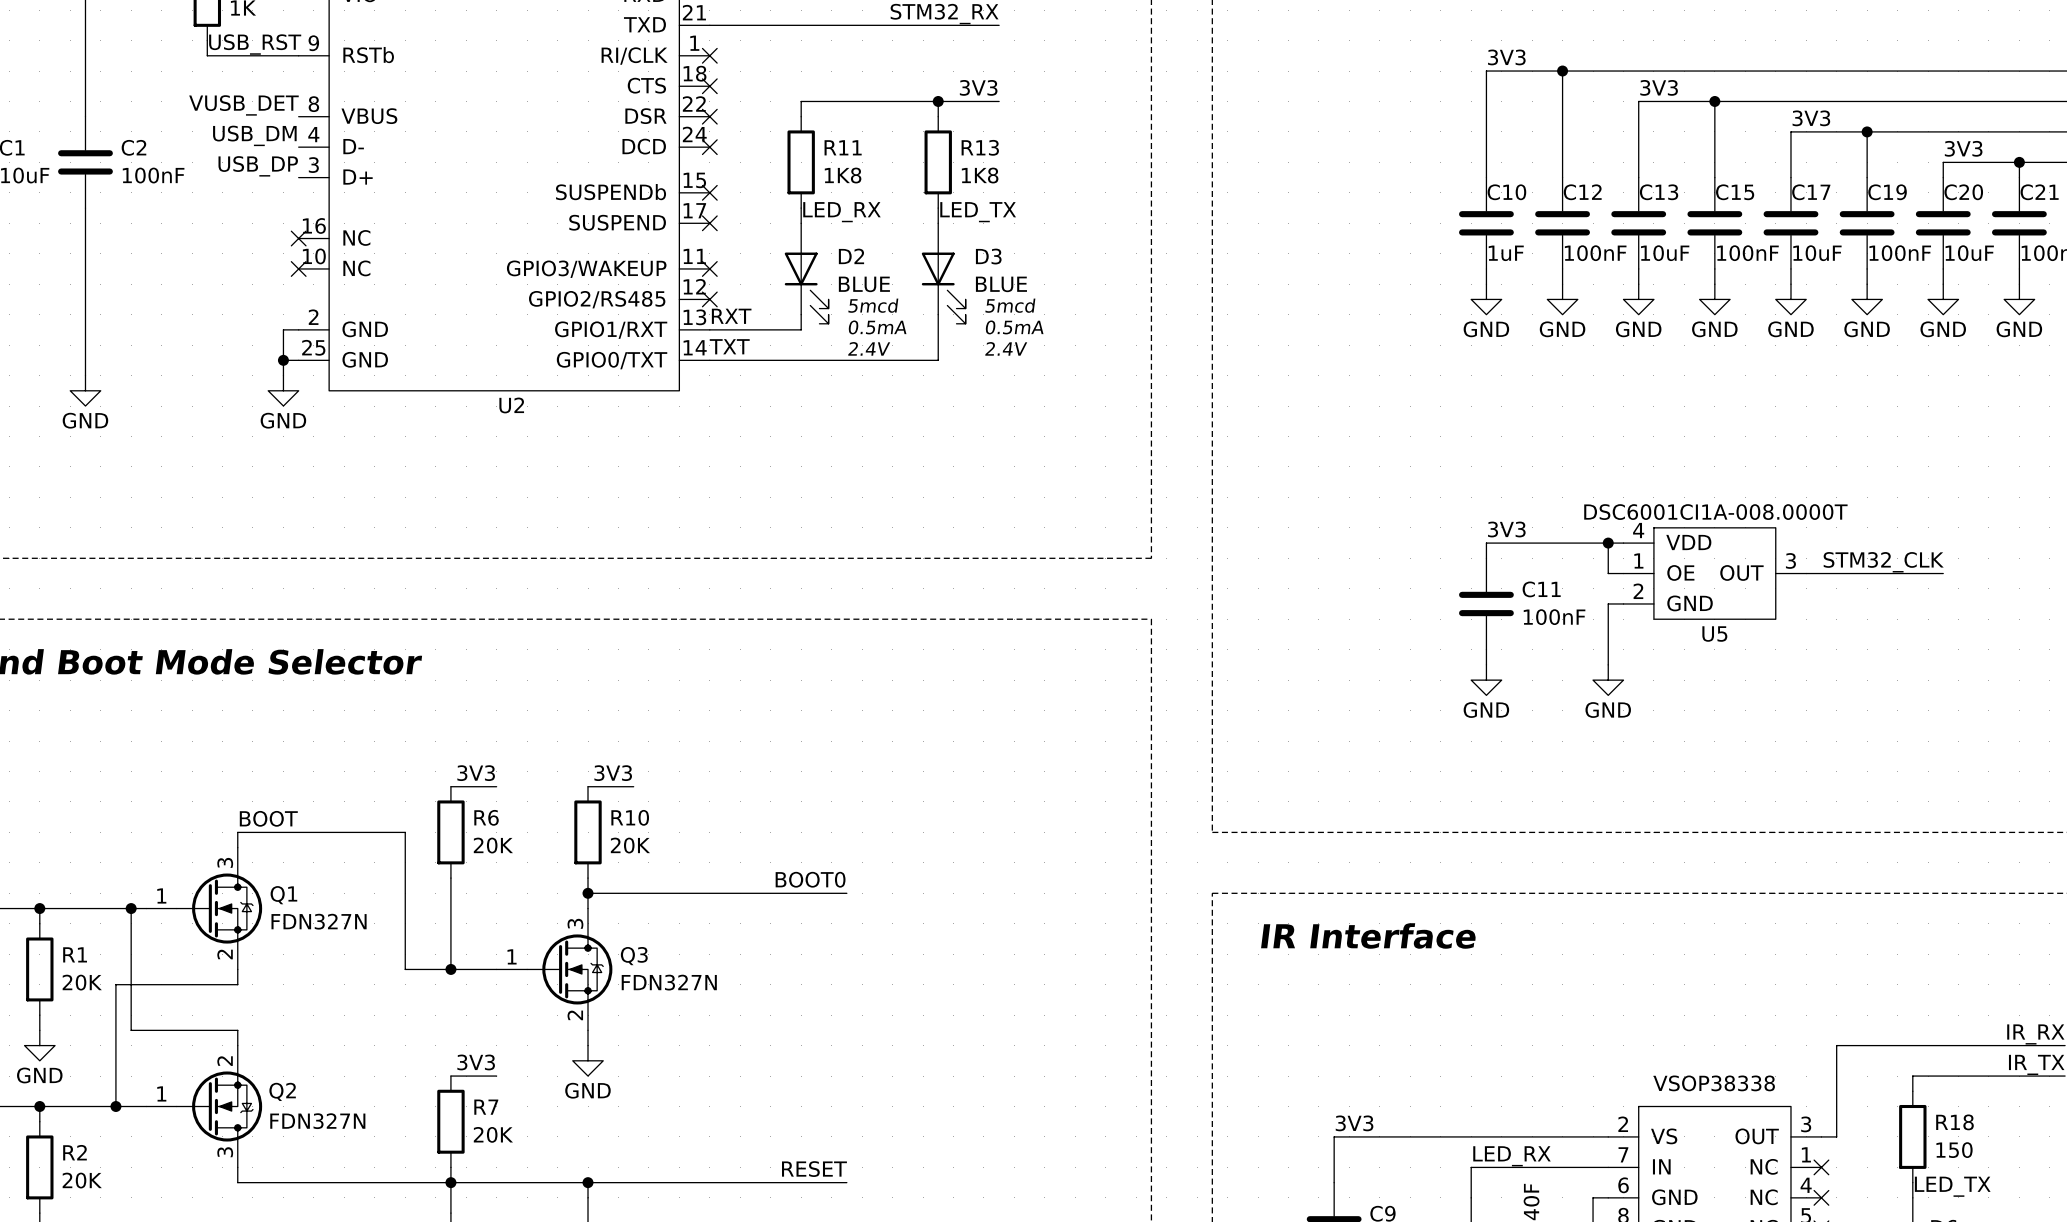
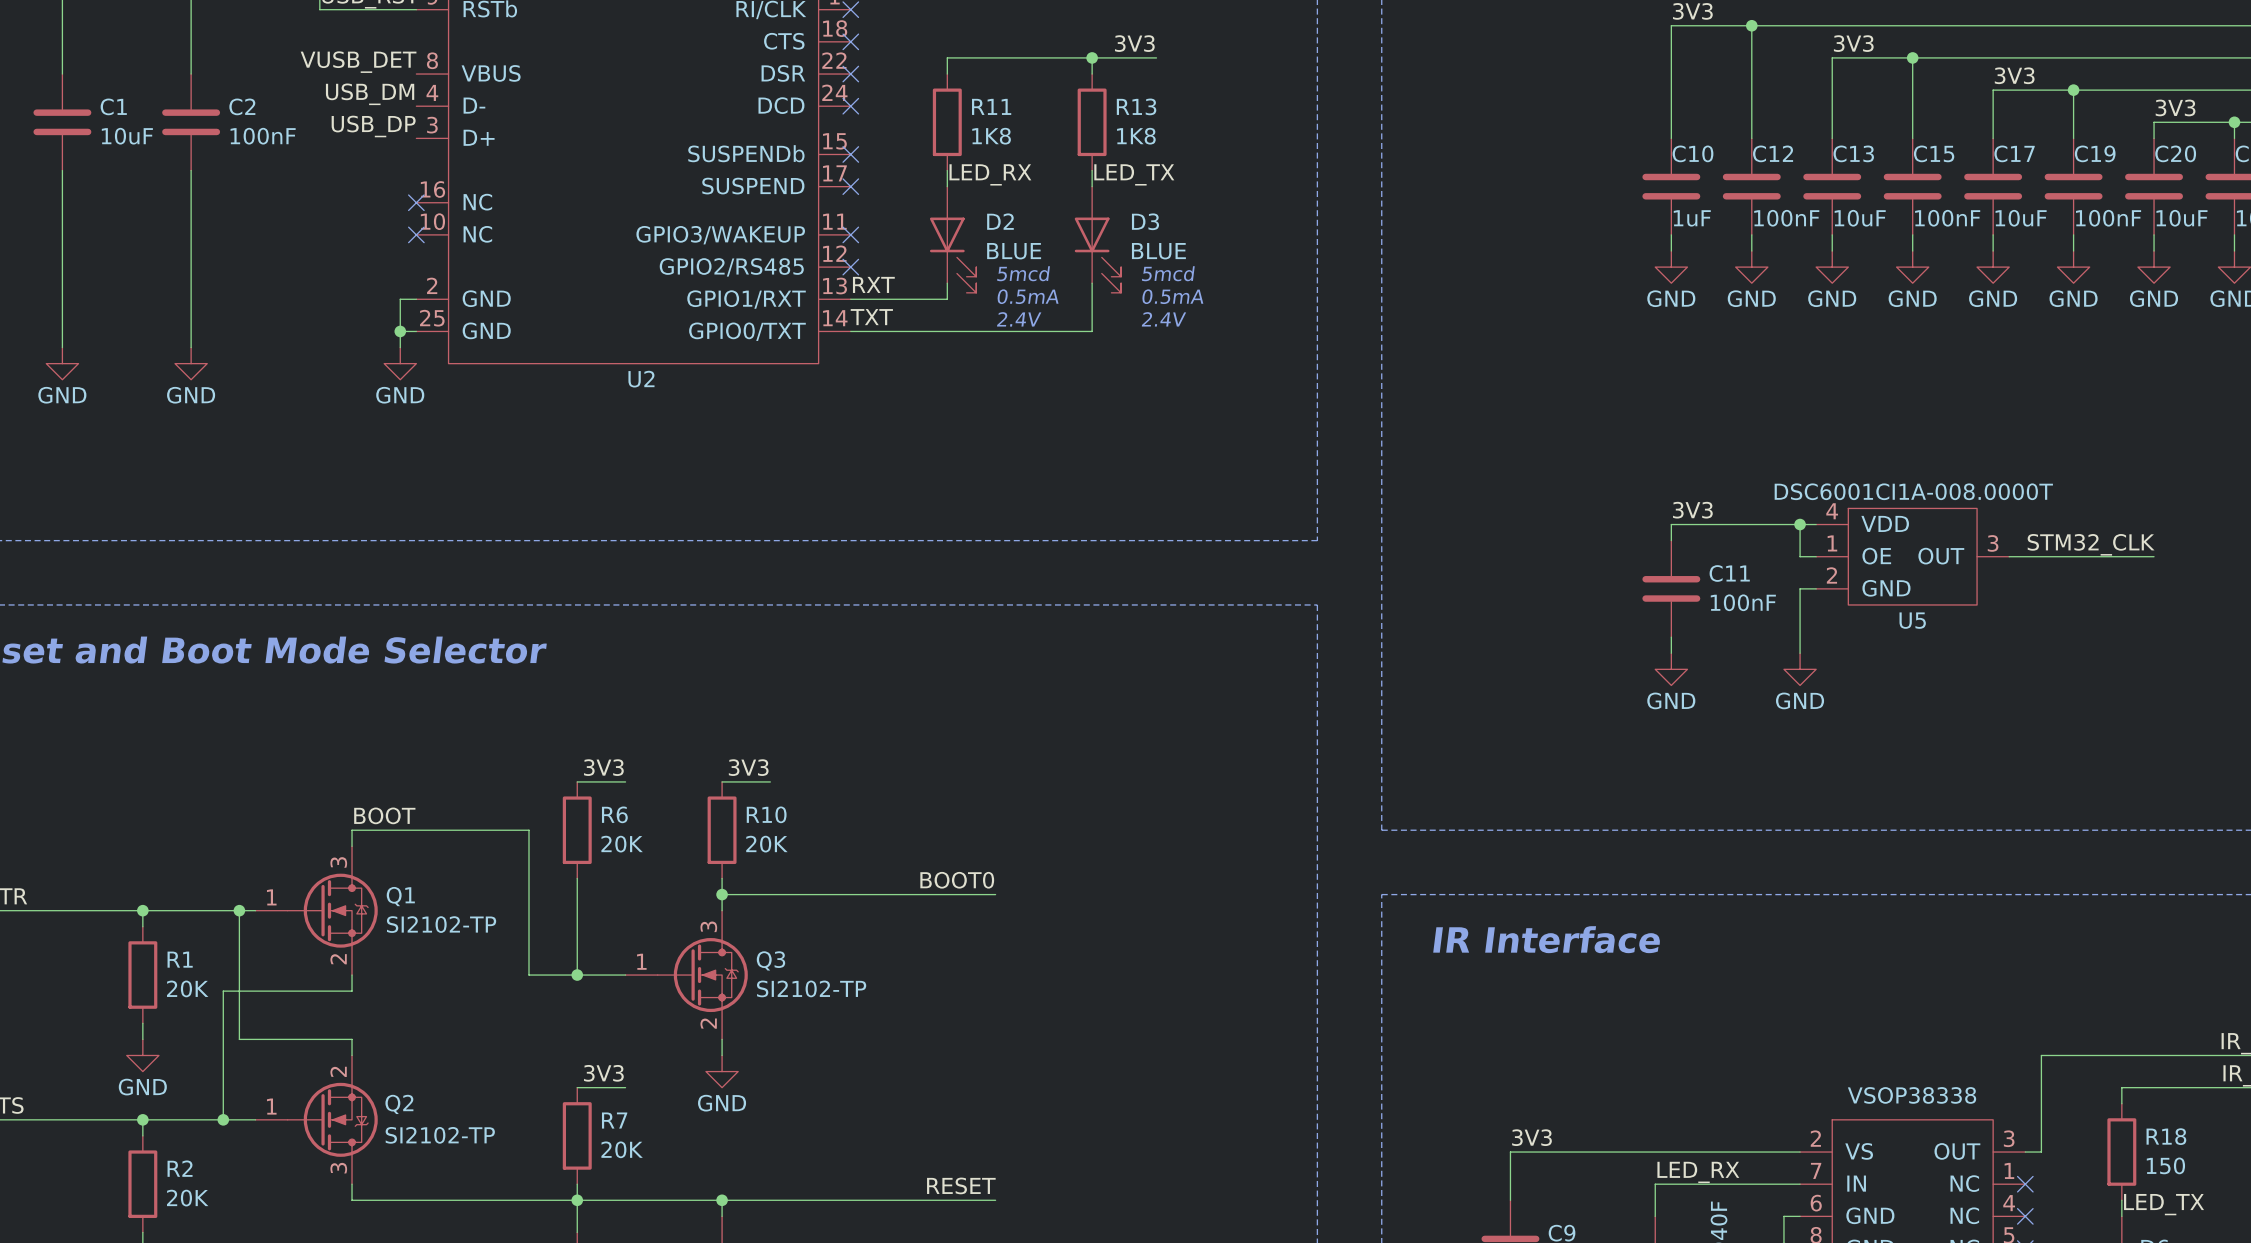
Q1 value: FDN327N (319, 921) -> SI2102-TP (441, 924)
Q3 value: FDN327N (669, 982) -> SI2102-TP (811, 988)
Q2 value: FDN327N (317, 1121) -> SI2102-TP (440, 1135)

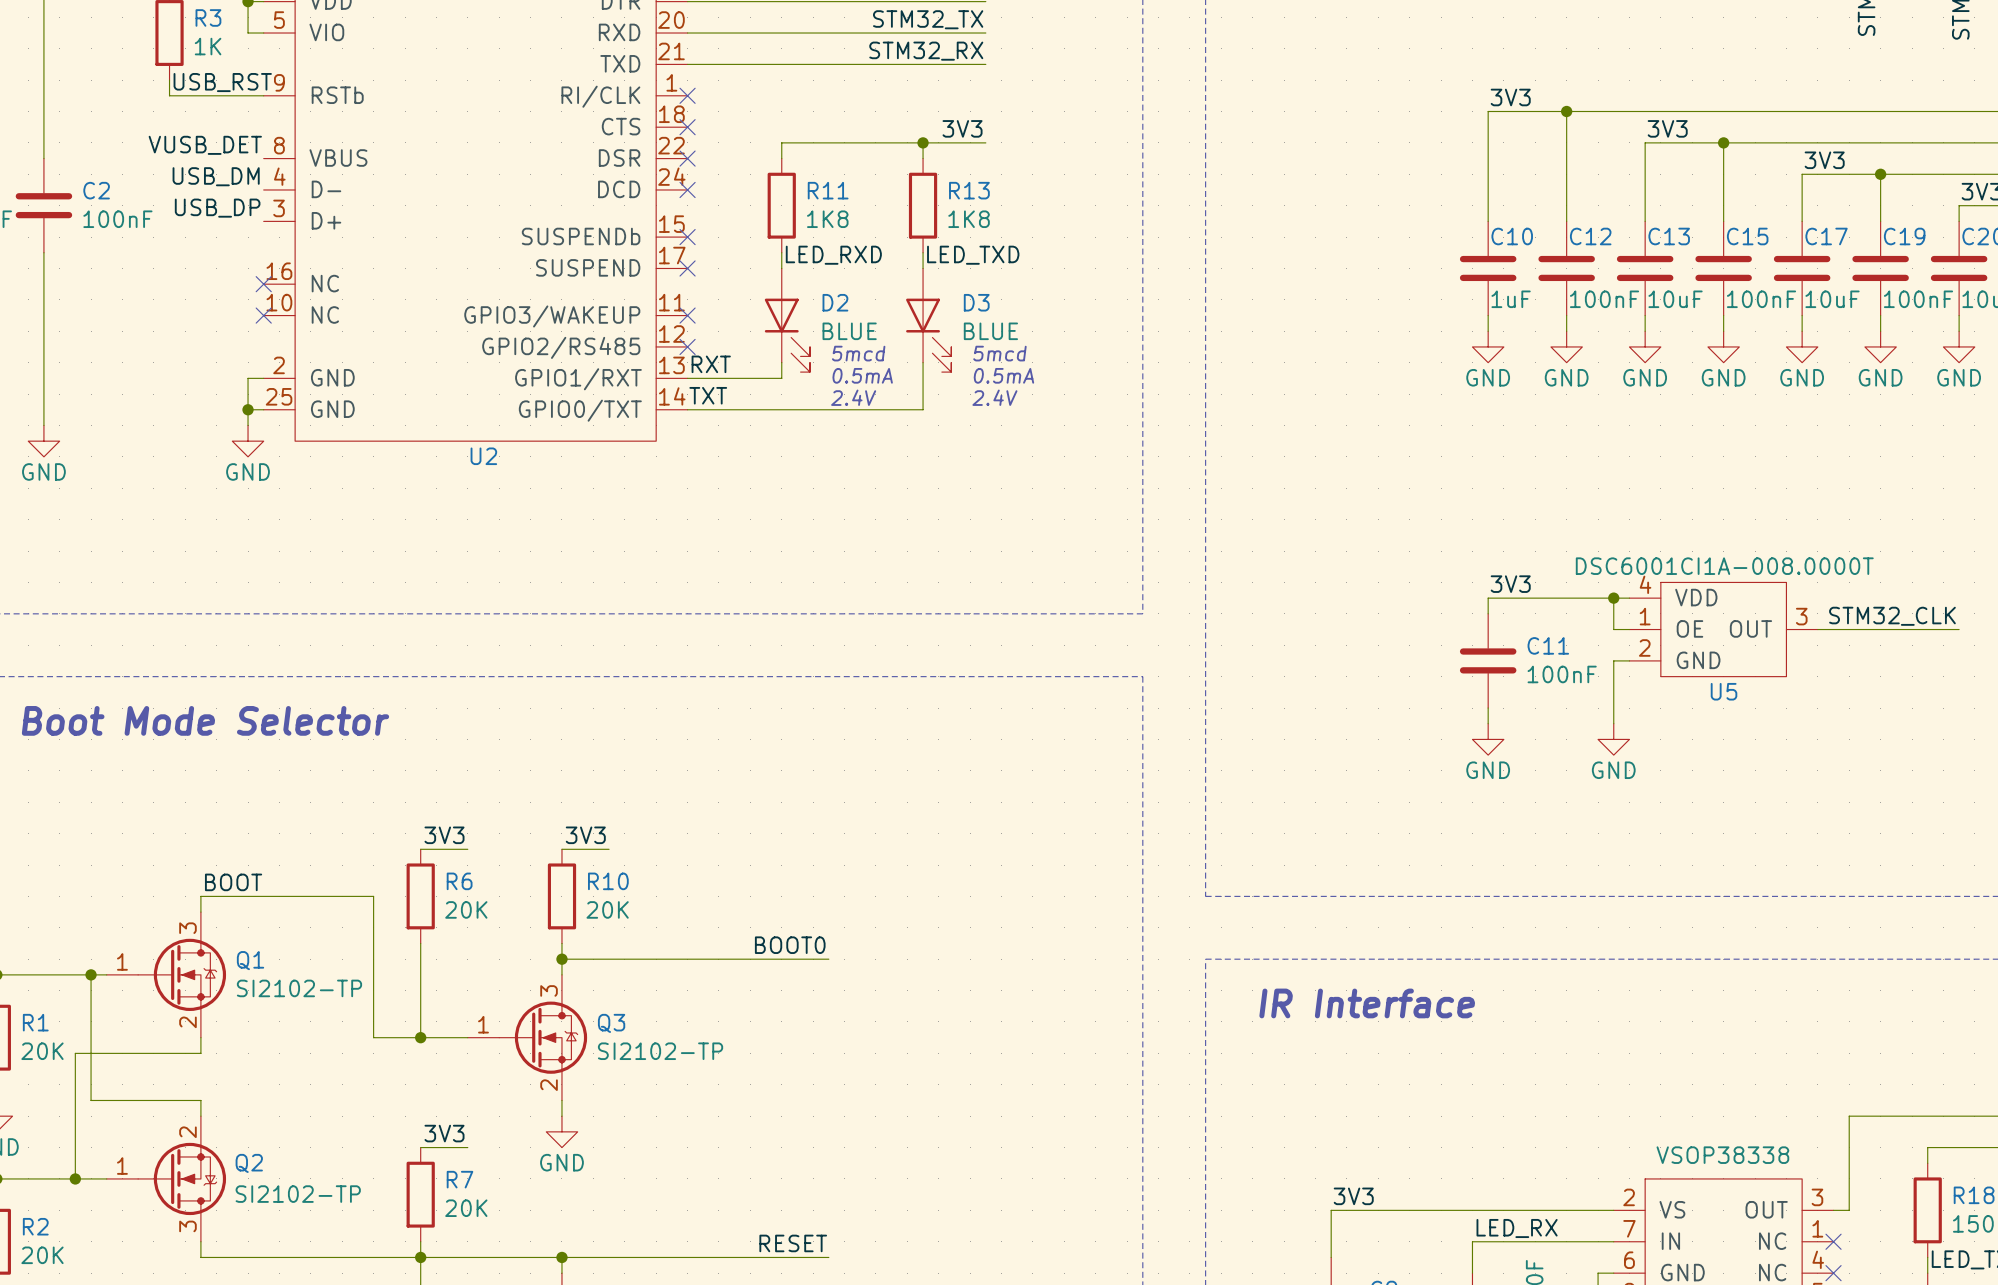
label: LED_RX (990, 174) -> LED_RXD (833, 255)
label: LED_TX (1134, 174) -> LED_TXD (973, 255)

